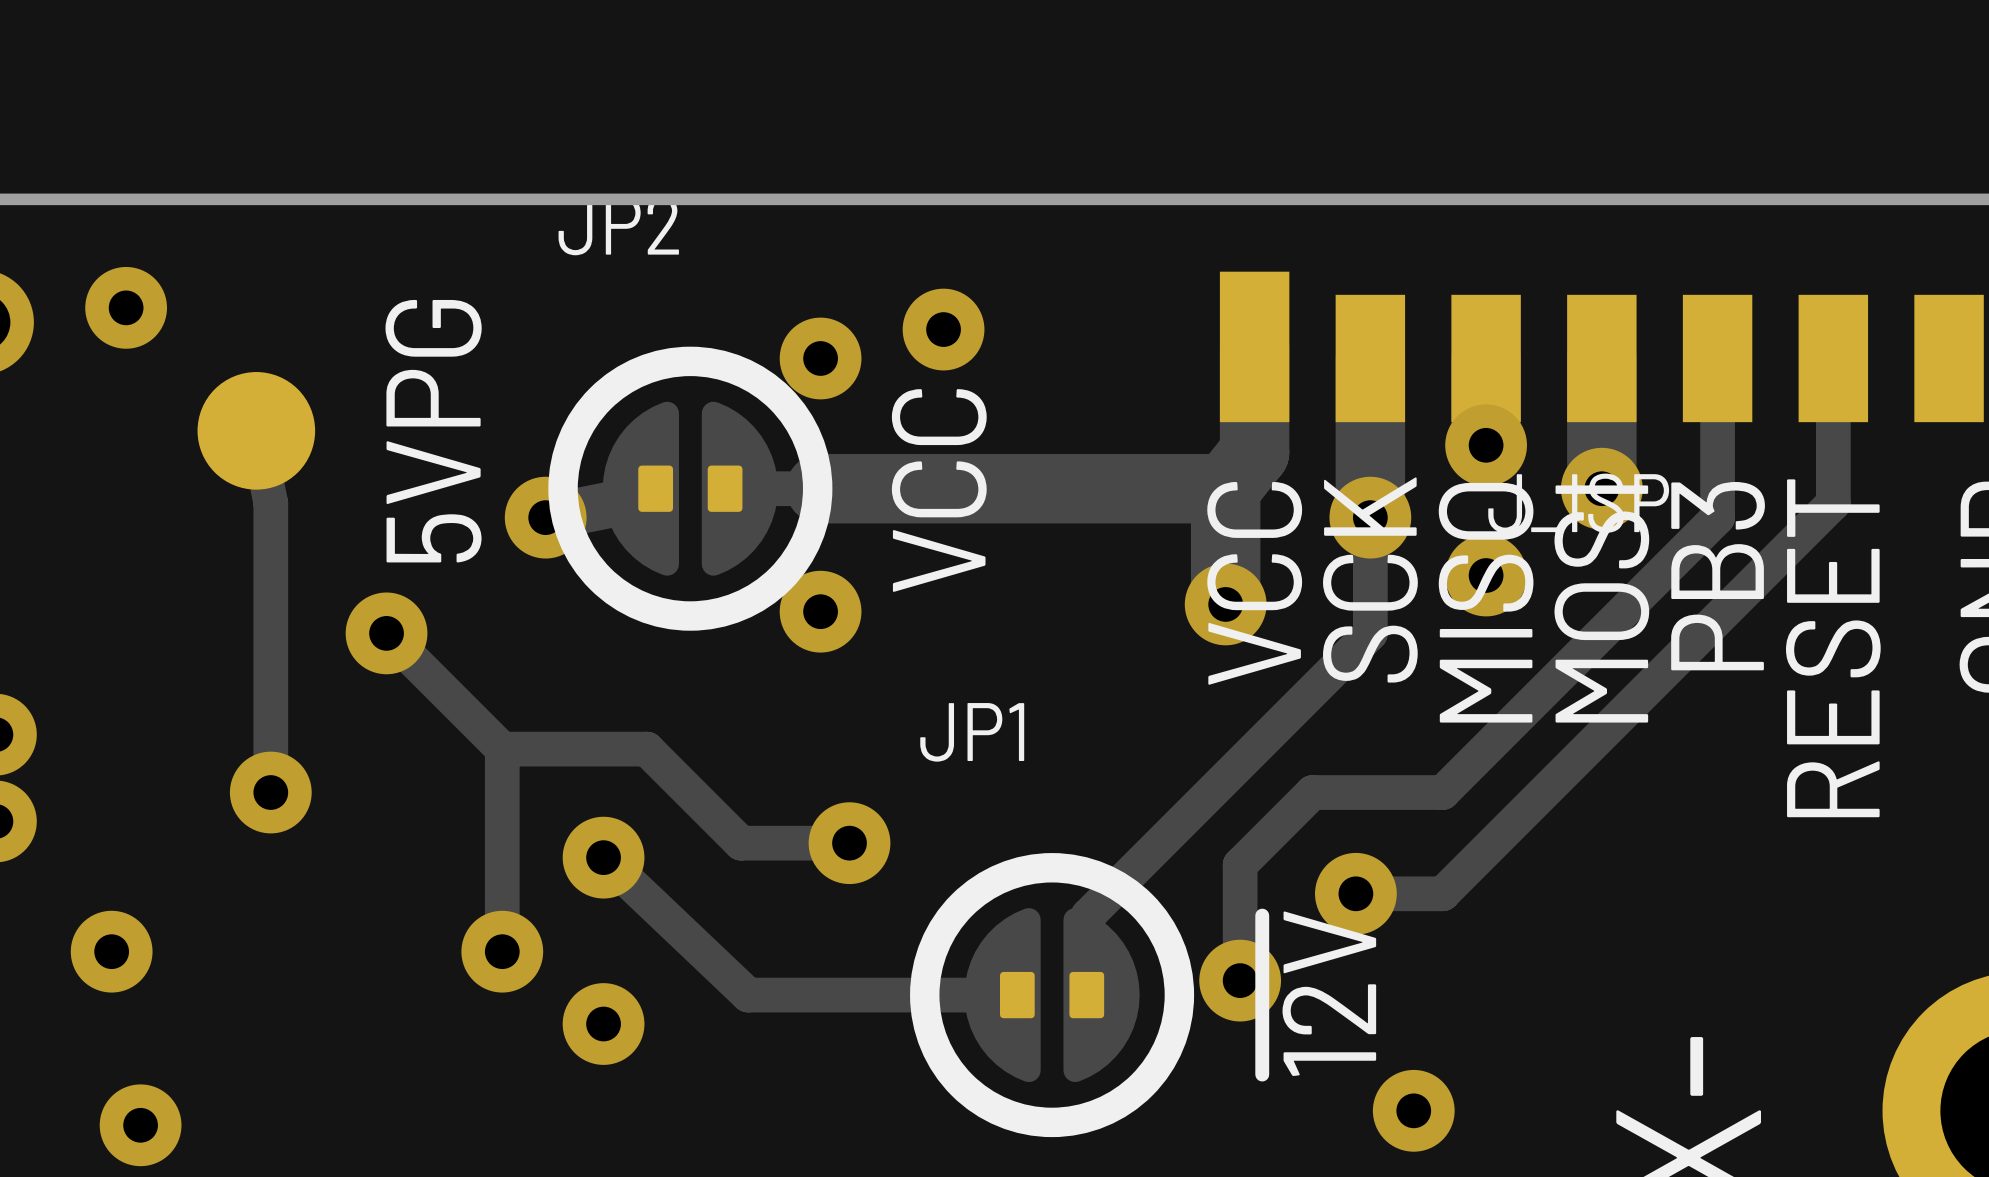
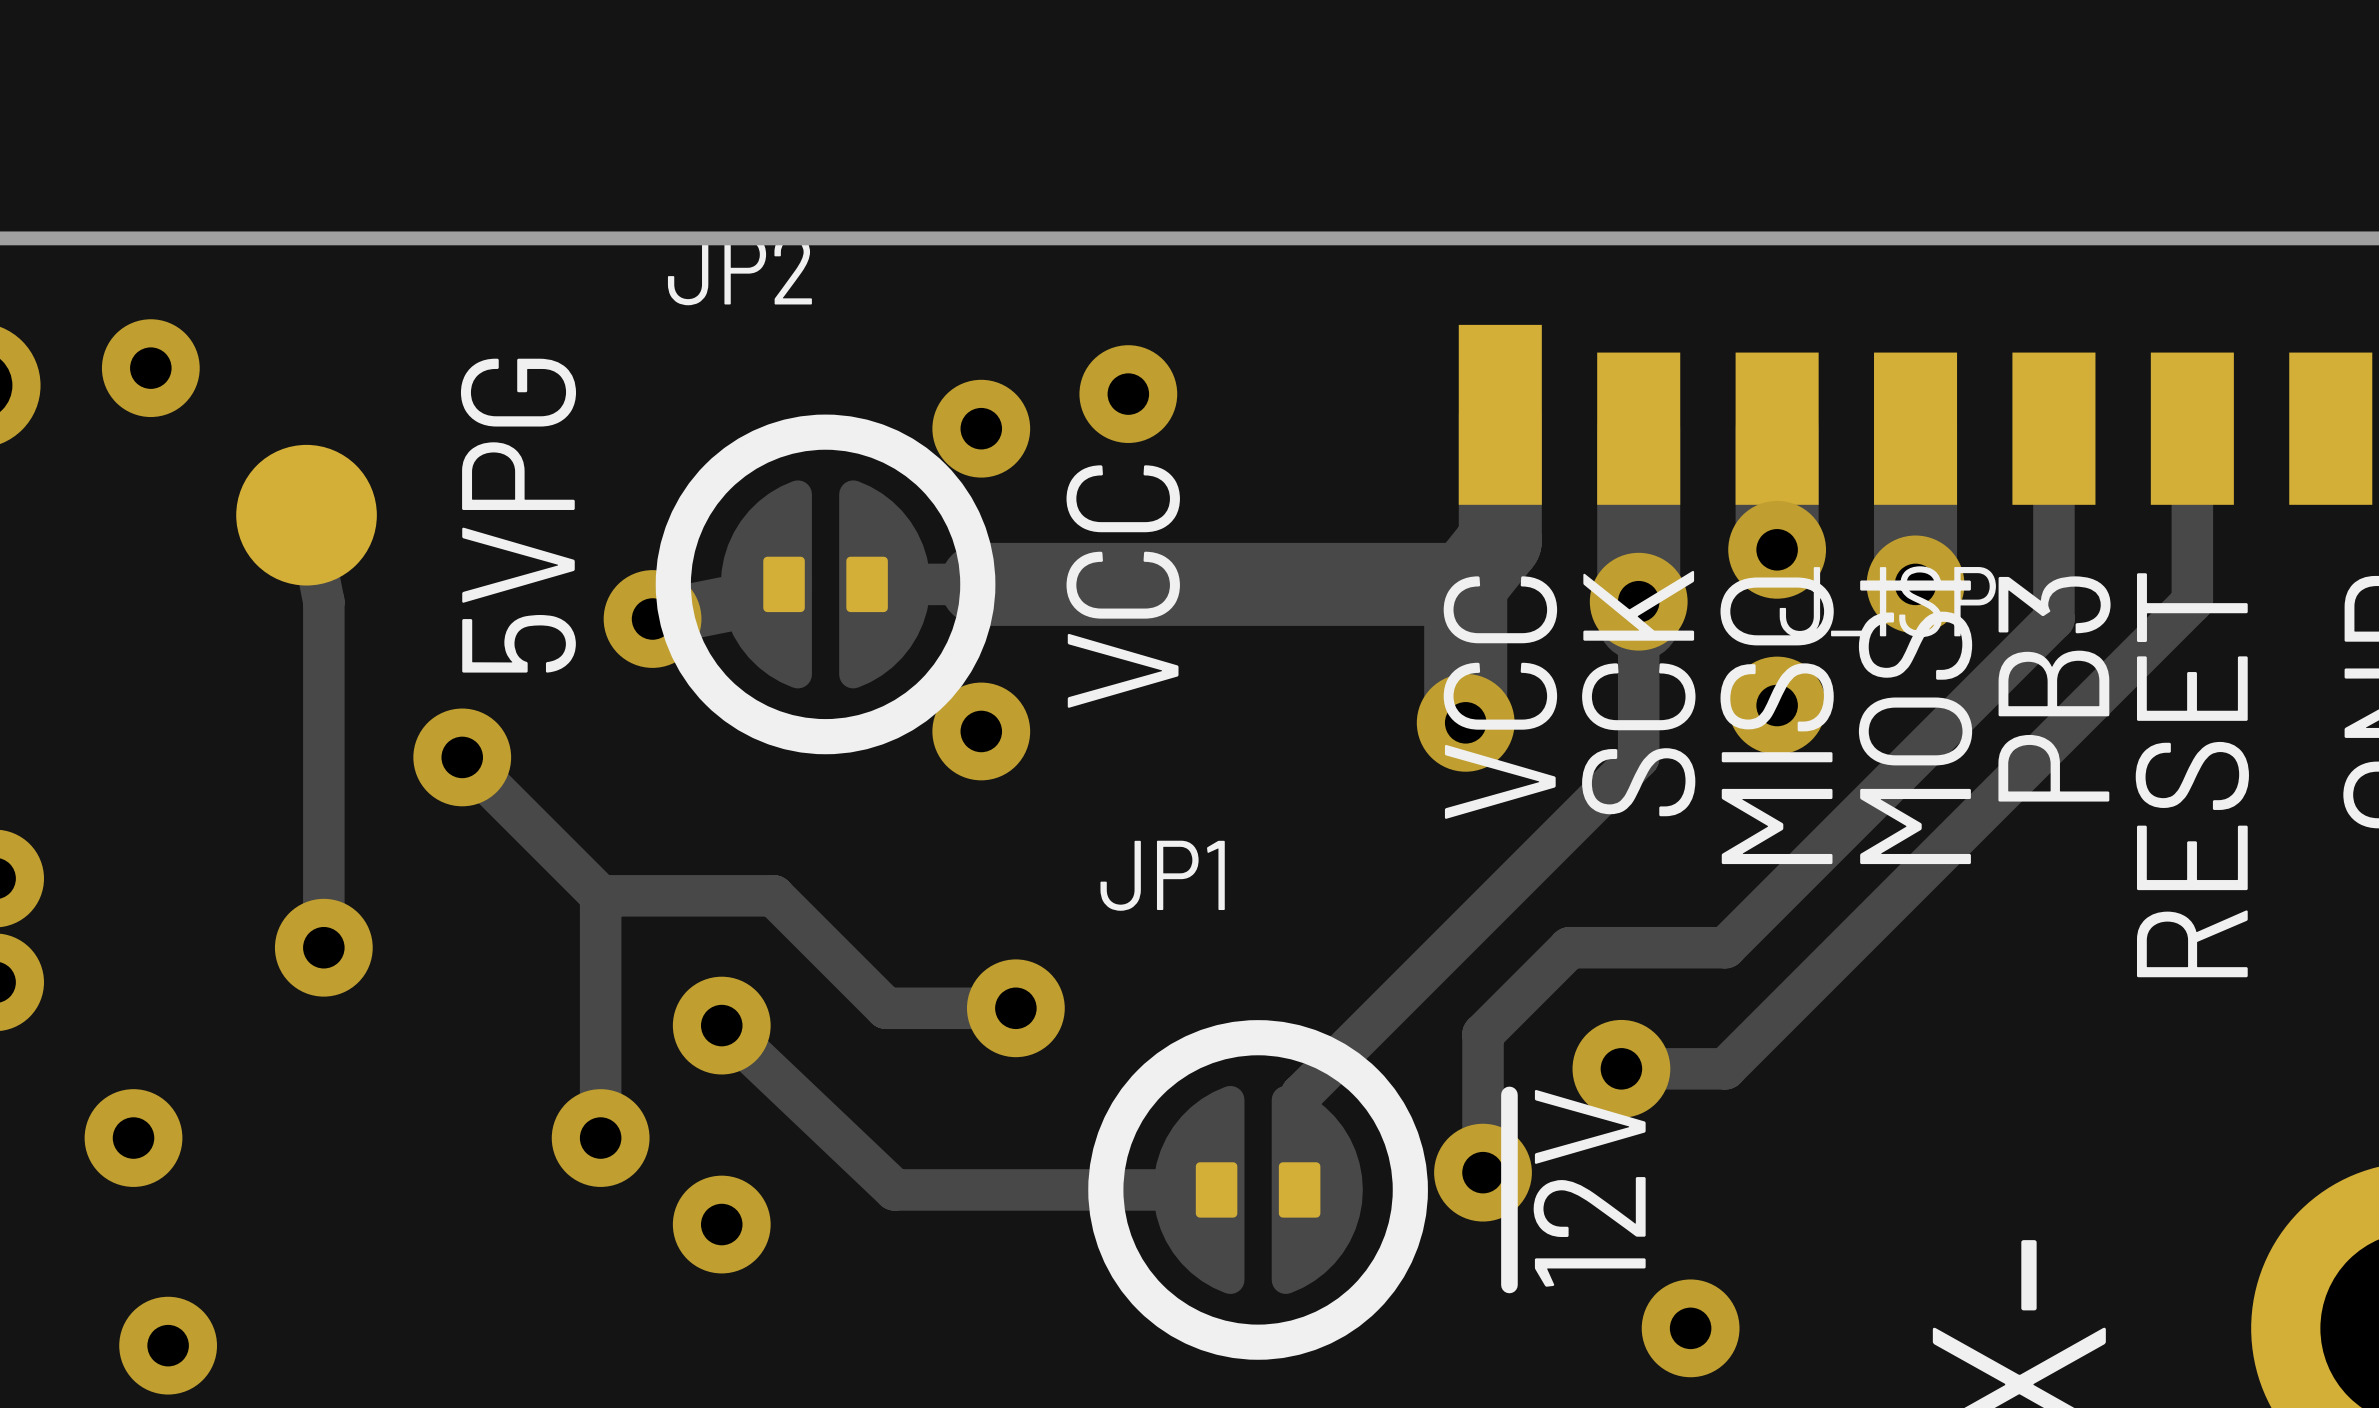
via position: (1486, 445) -> (1777, 549)
via position: (1370, 517) -> (1638, 601)
via position: (1486, 575) -> (1777, 705)

